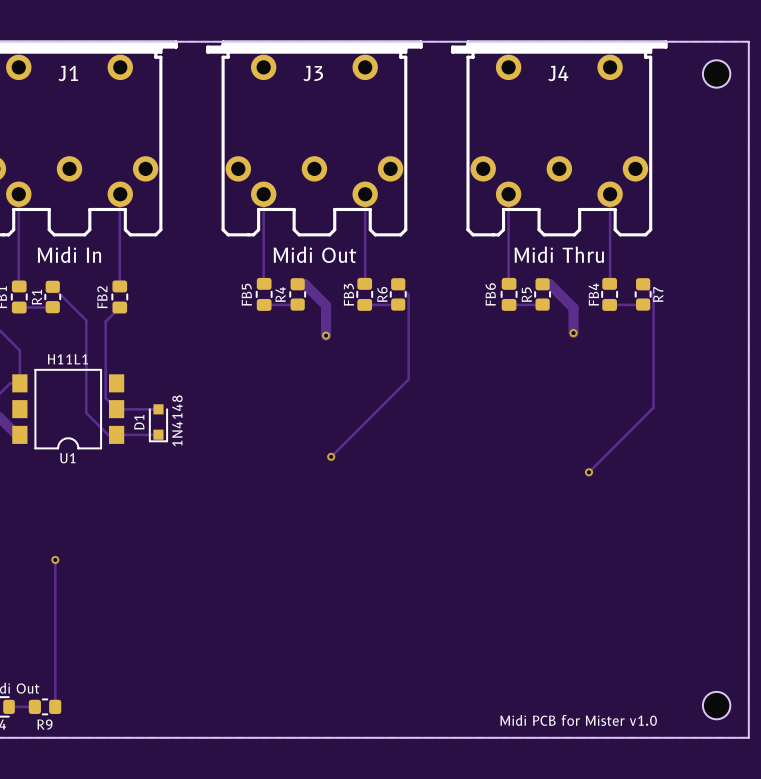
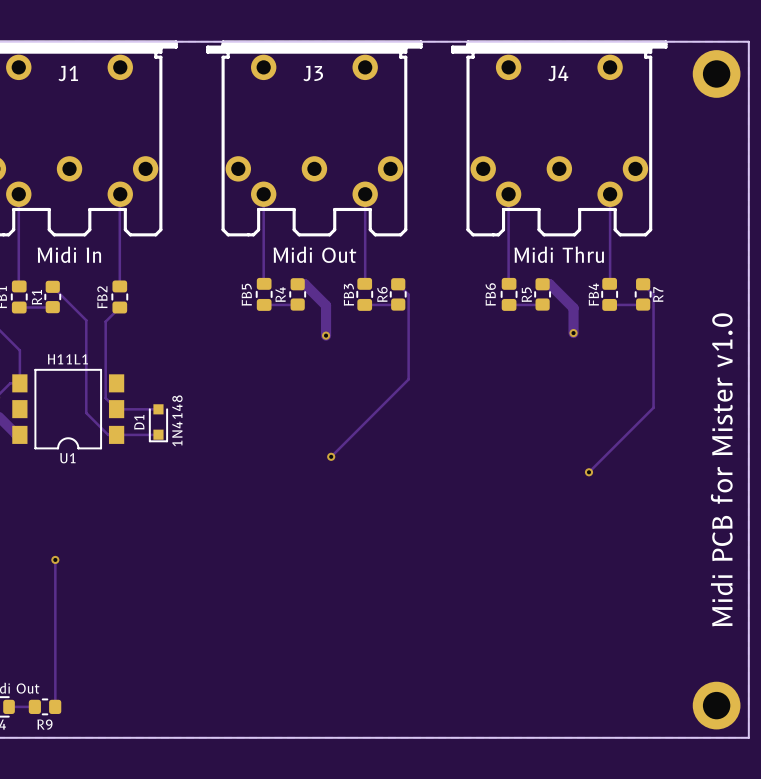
part footprint: [702, 60, 731, 88] -> [692, 50, 741, 98]
text: none -> Midi PCB for Mister v1.0 (721, 469)
part footprint: [702, 691, 731, 720] -> [692, 681, 741, 730]
text: Midi PCB for Mister v1.0 (578, 720) -> none

